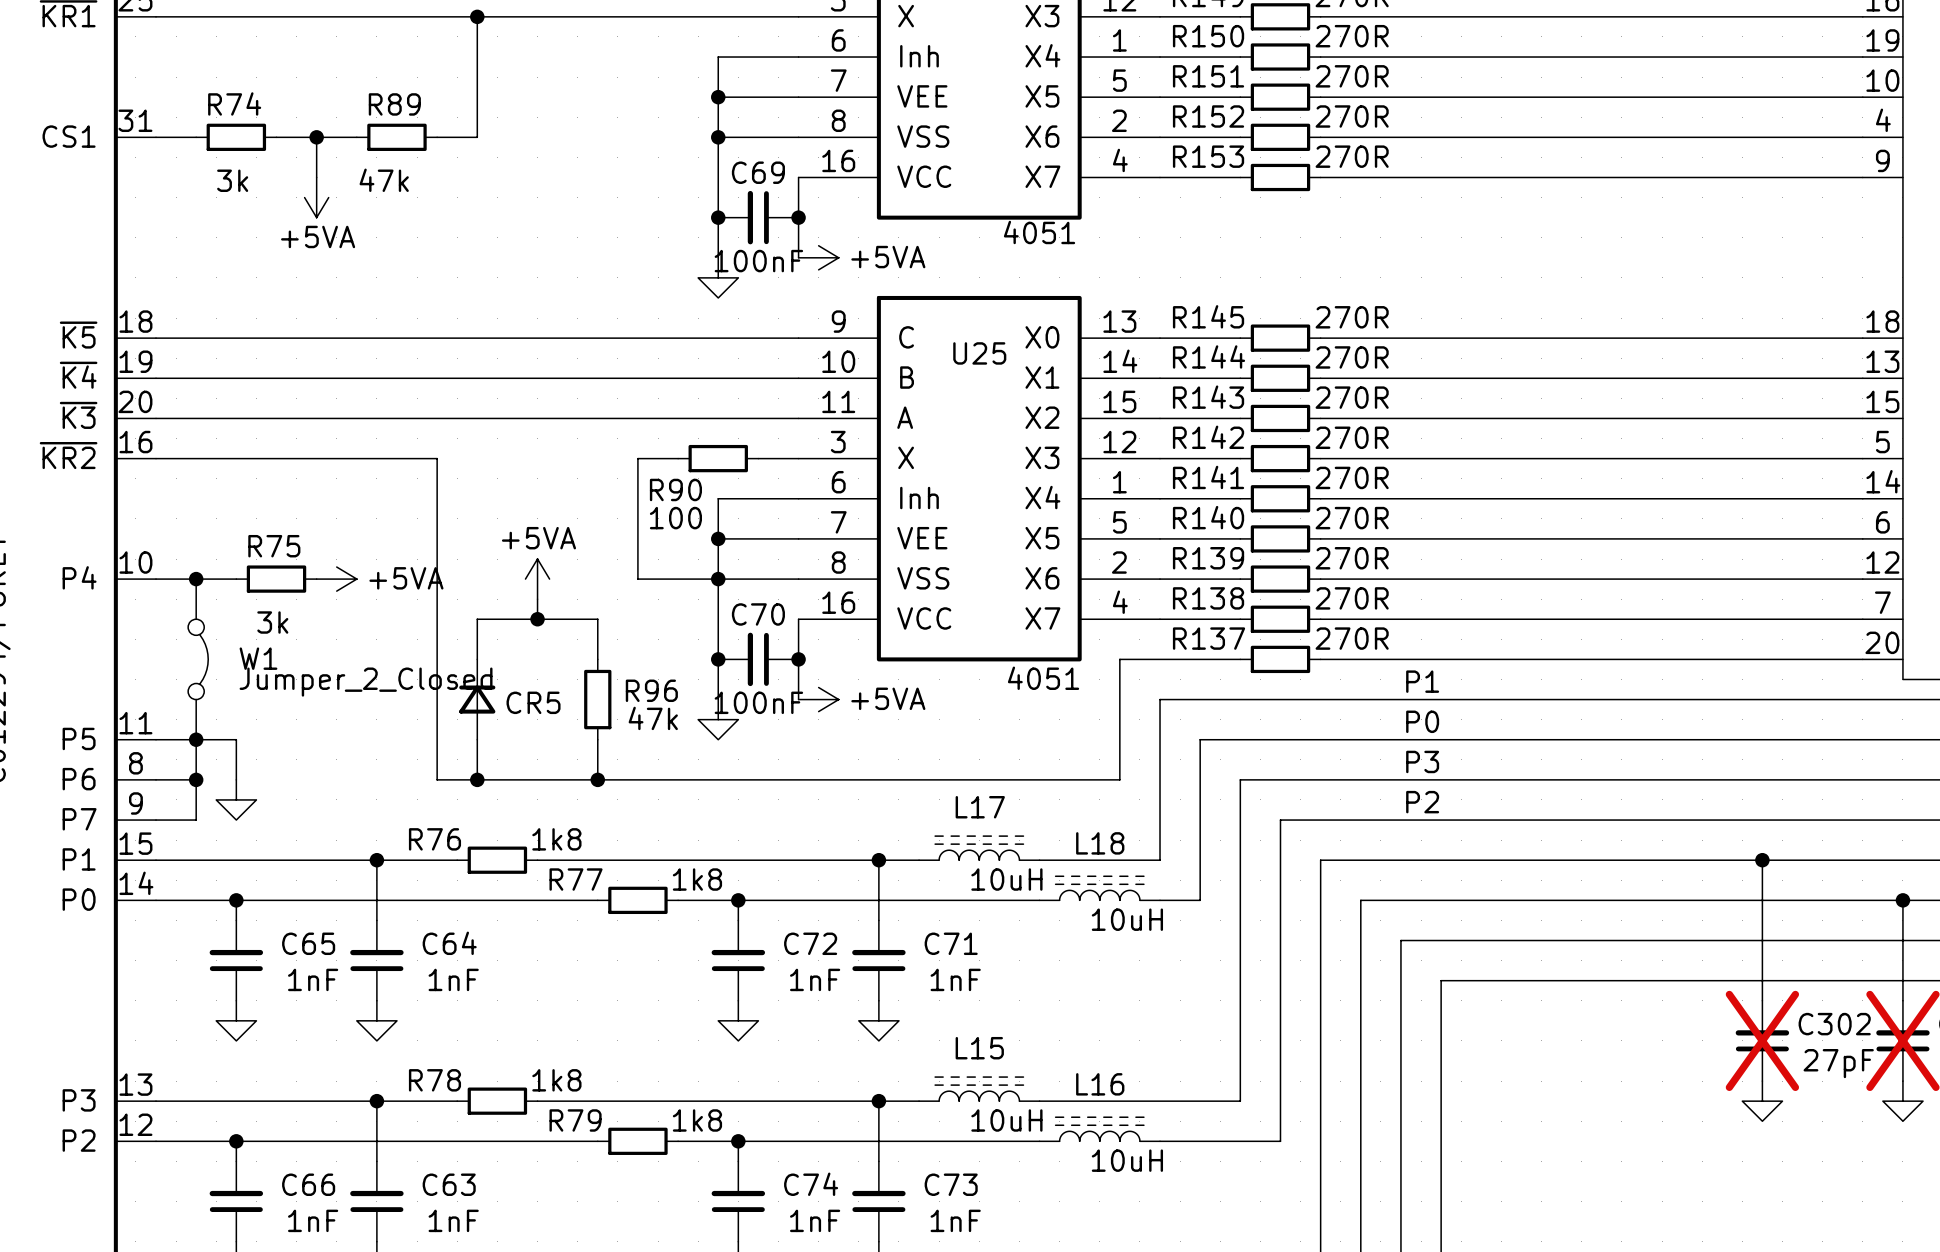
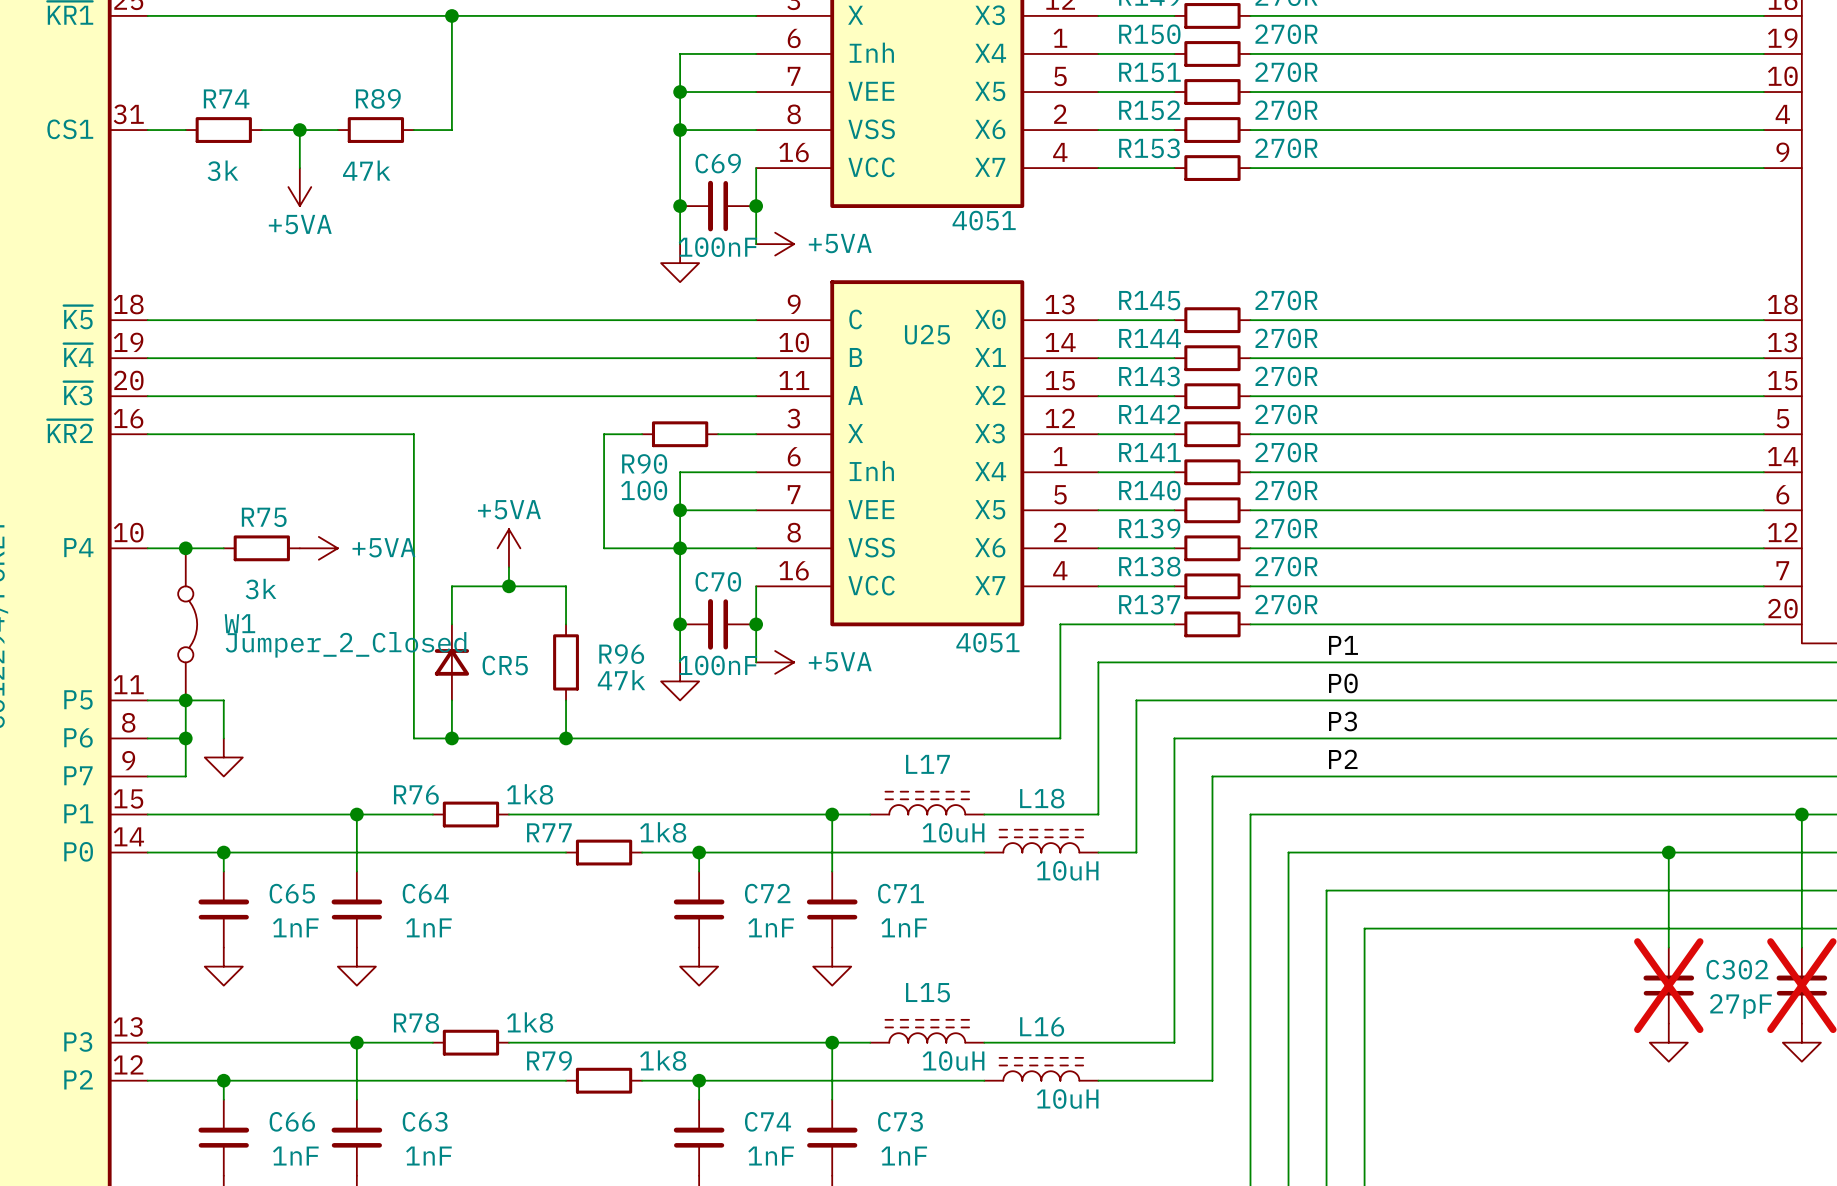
wire: (1762, 860) (1762, 900) -> (1801, 814) (1801, 852)
junction position: (1762, 860) -> (1668, 852)
junction position: (1902, 900) -> (1801, 814)

